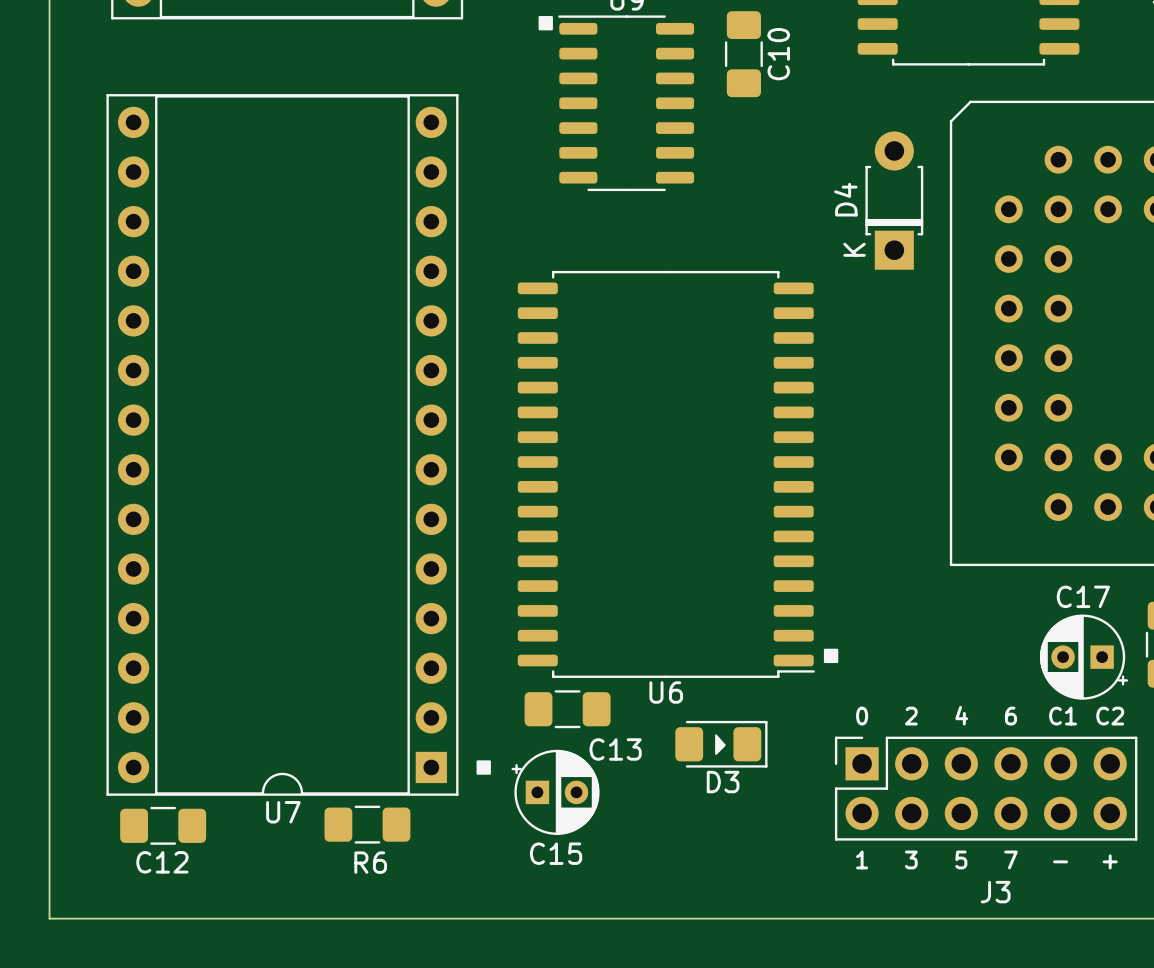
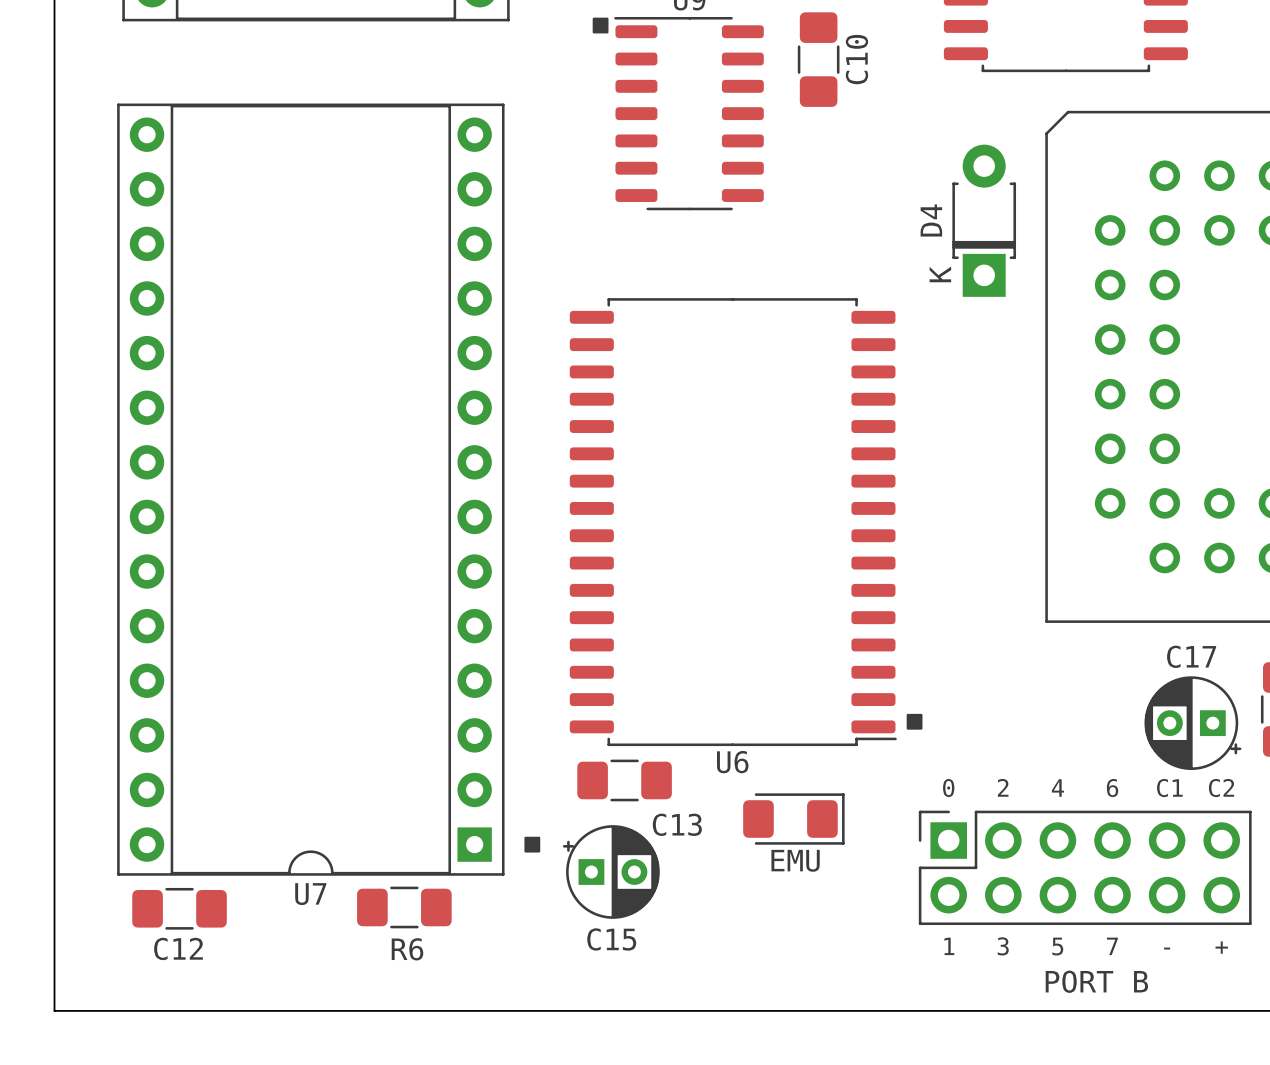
drawing: [715, 734, 726, 755] -> none
D3 name: D3 (723, 782) -> EMU (795, 860)
J3 name: J3 (995, 892) -> PORT B (1096, 981)

